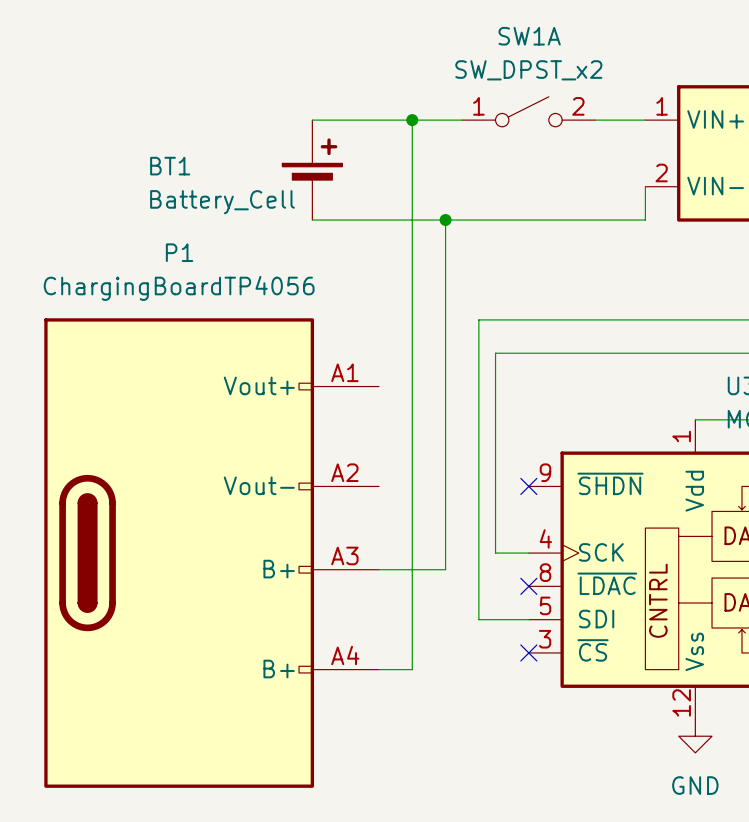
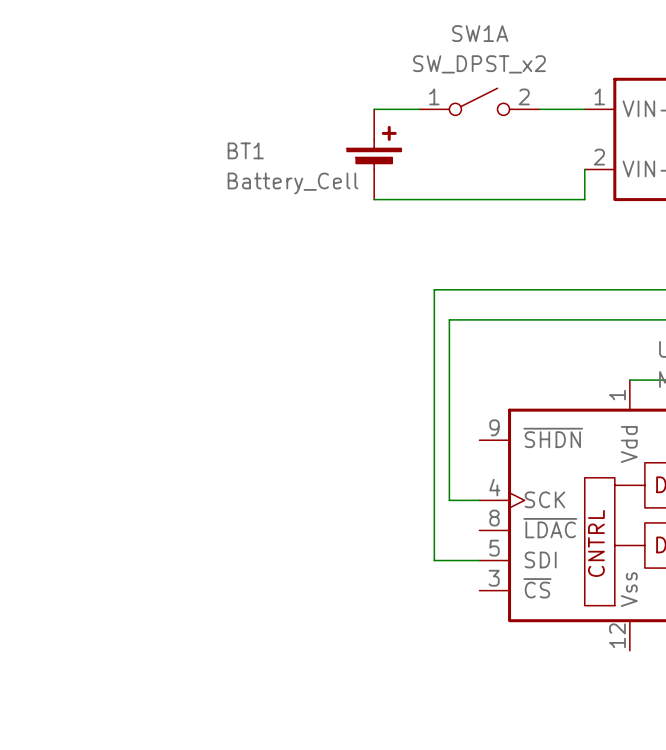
wire: (312, 120) (412, 120) (412, 669) (378, 669) -> none
junction: (412, 120) -> none
BT1 position: (312, 170) -> (374, 154)
wire: (312, 220) (412, 220) -> none
wire: (445, 220) (445, 569) (378, 569) -> none
junction: (445, 220) -> none
no-connect mark: (528, 486) -> none
P1: ChargingBoardTP4056 (211, 553) -> none
no-connect mark: (528, 586) -> none
no-connect mark: (528, 652) -> none
power symbol: GND (695, 736) -> none

